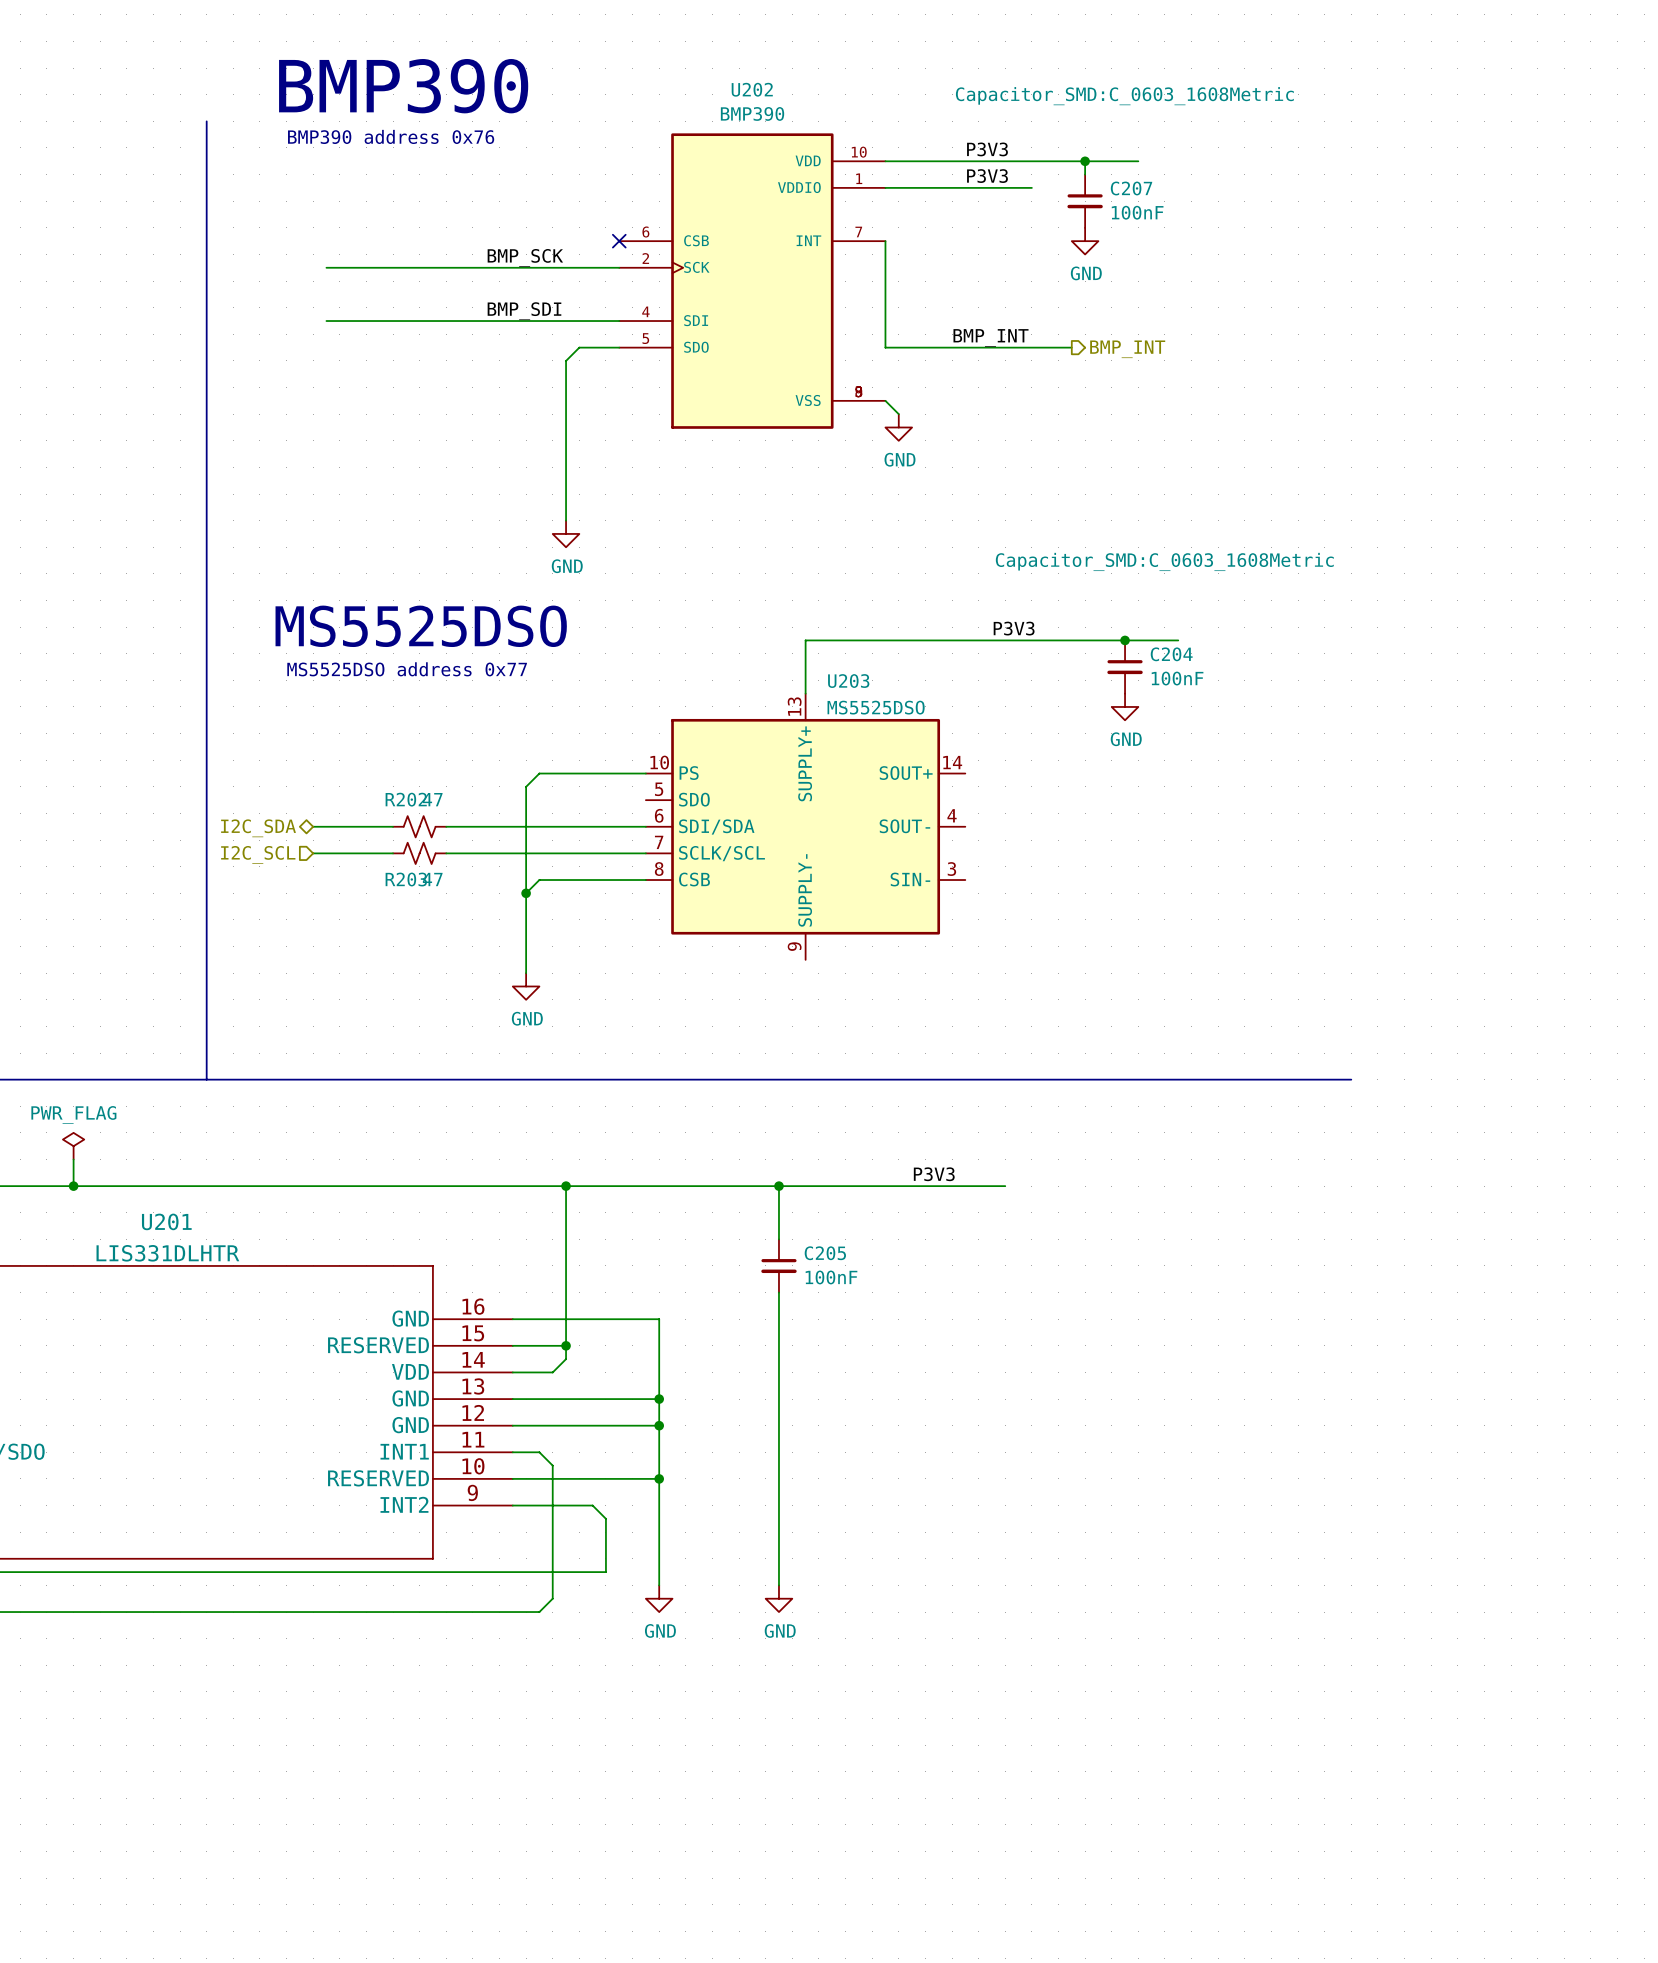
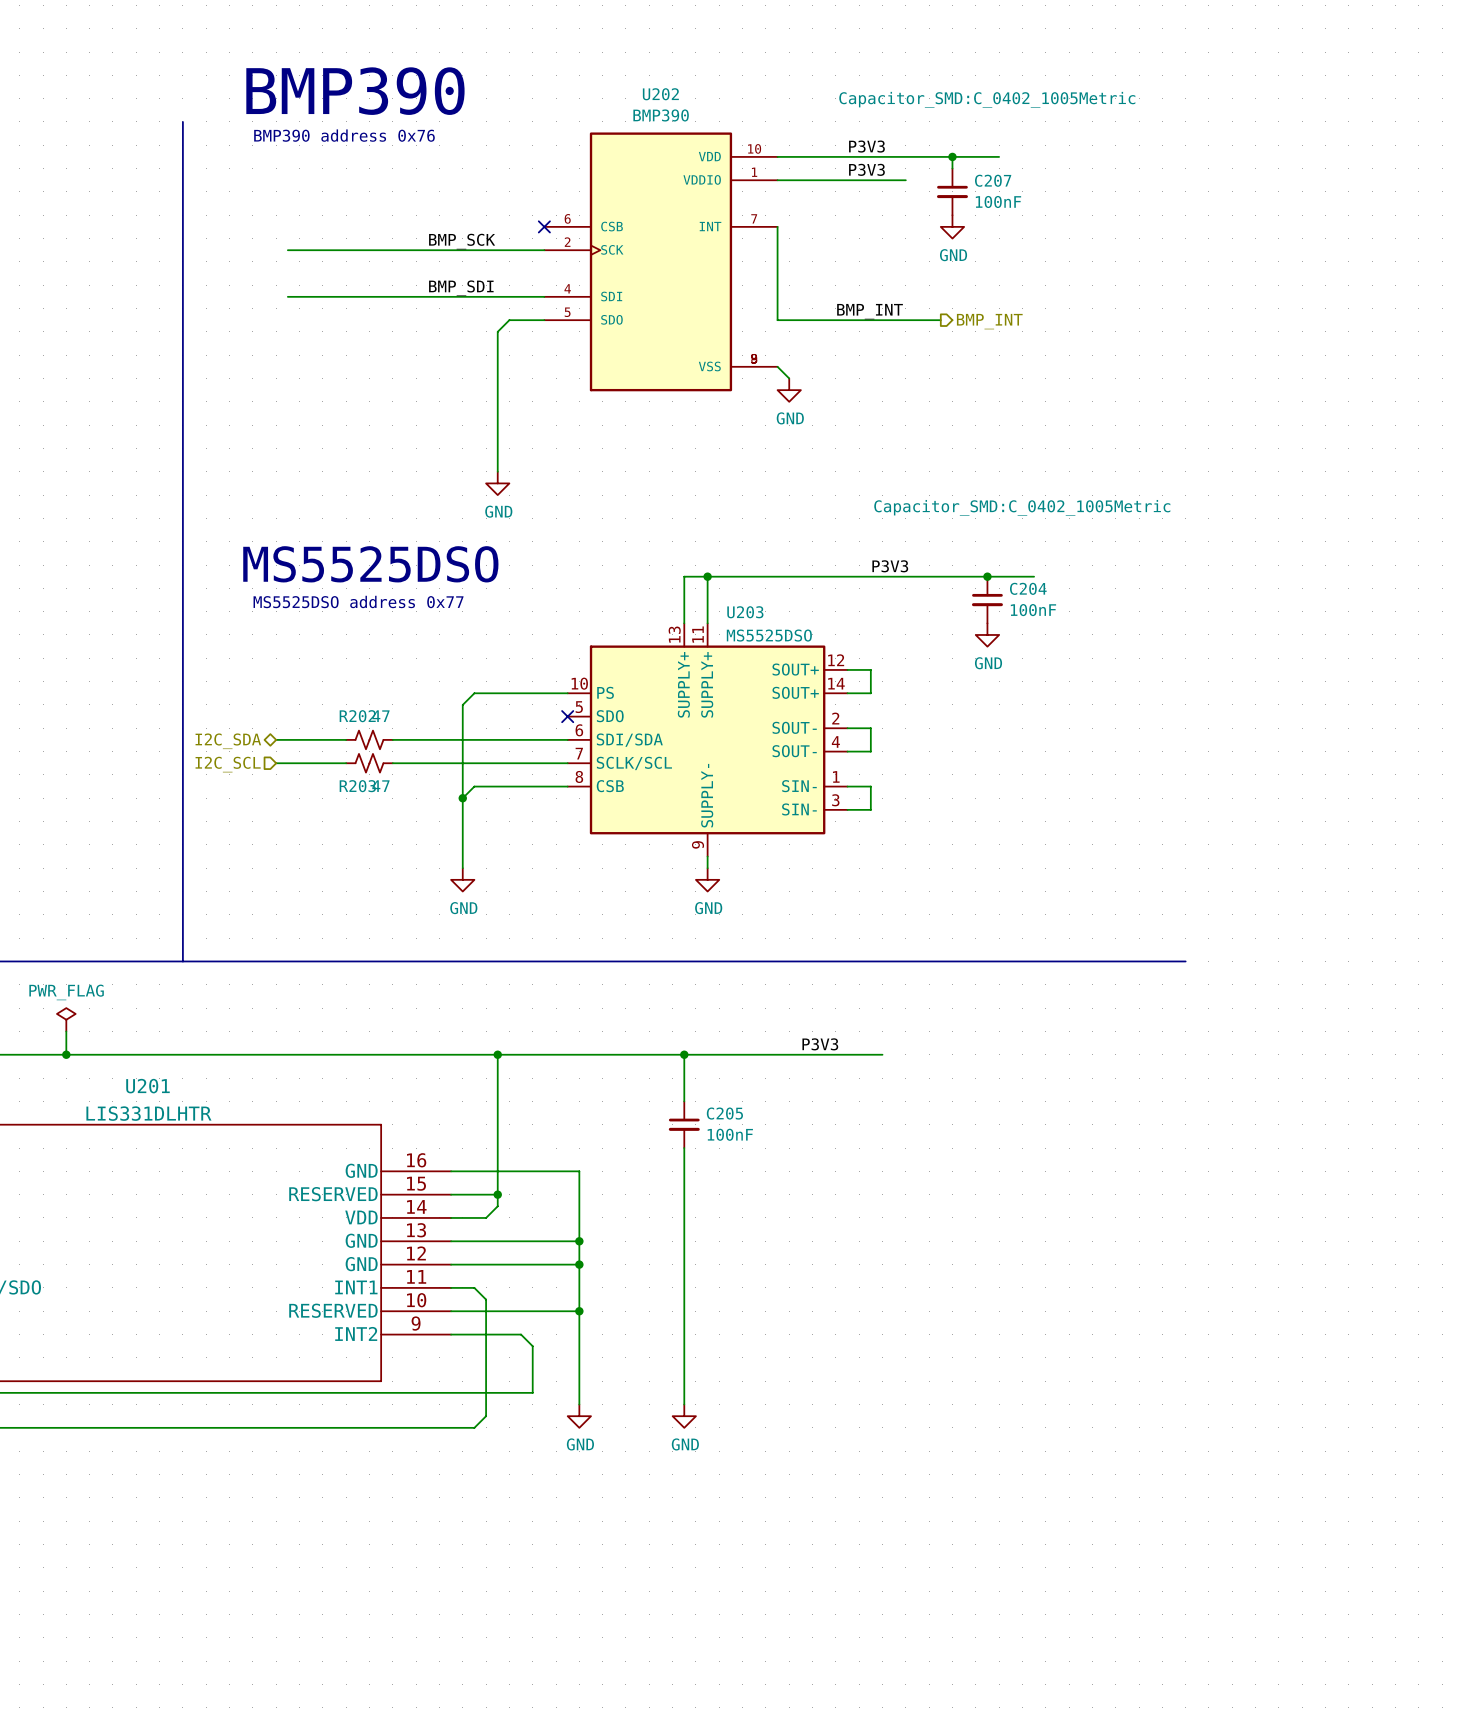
C207 text: Capacitor_SMD:C_0603_1608Metric (1124, 96) -> Capacitor_SMD:C_0402_1005Metric (987, 99)
C204 text: Capacitor_SMD:C_0603_1608Metric (1164, 561) -> Capacitor_SMD:C_0402_1005Metric (1022, 507)
wire: none -> (707, 576) (684, 576) (684, 623)
junction: none -> (707, 576)
U203 symbol: [645, 693, 966, 960] -> [567, 623, 848, 857]
wire: none -> (847, 669) (870, 669) (870, 693) (847, 693)
no-connect mark: none -> (567, 716)
wire: none -> (847, 728) (870, 728) (870, 751) (847, 751)
wire: none -> (847, 786) (870, 786) (870, 809) (847, 809)
wire: none -> (707, 856) (707, 868)
power symbol: none -> GND (707, 879)

